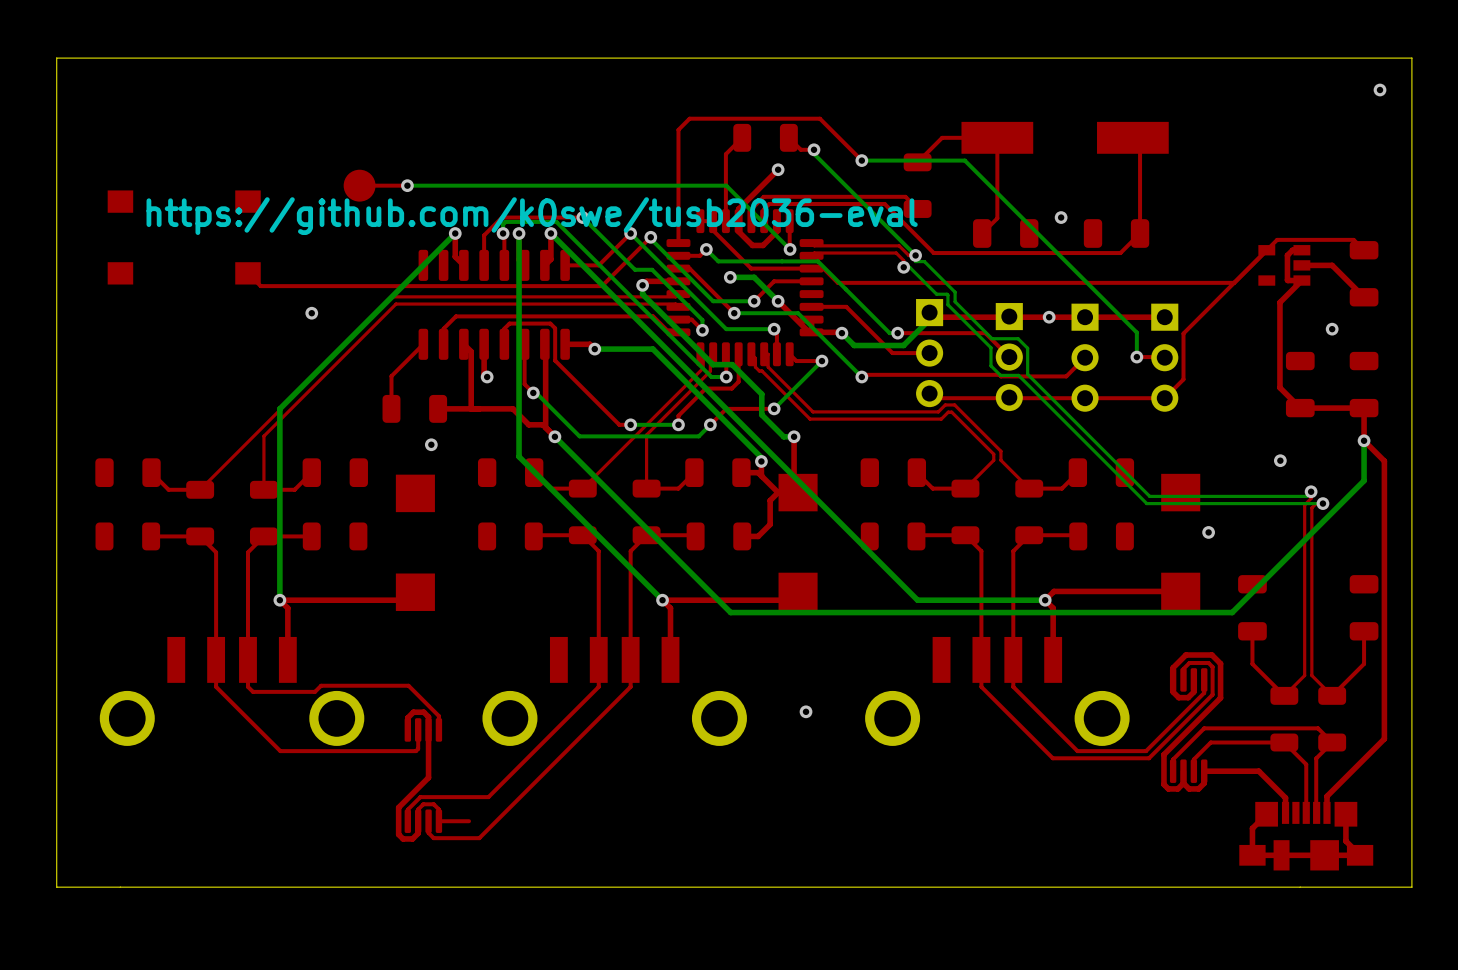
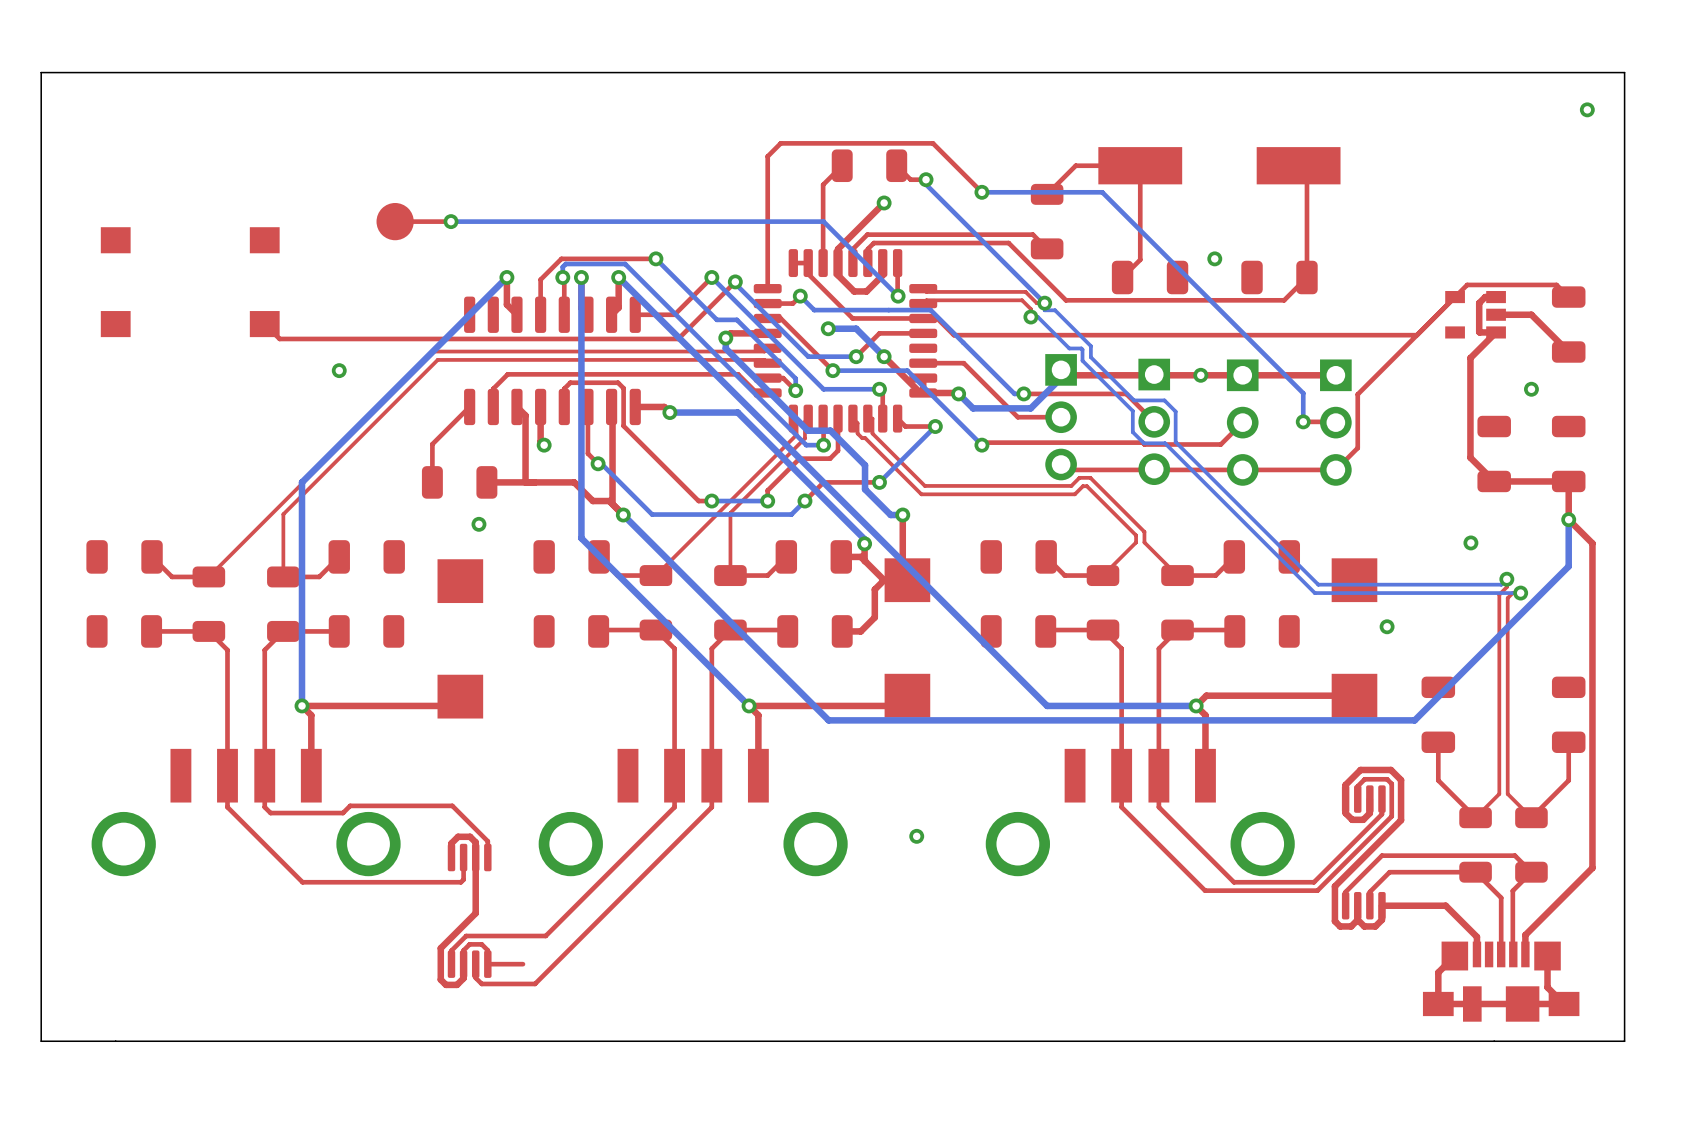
text: https://github.com/k0swe/tusb2036-eval (532, 216) -> none

